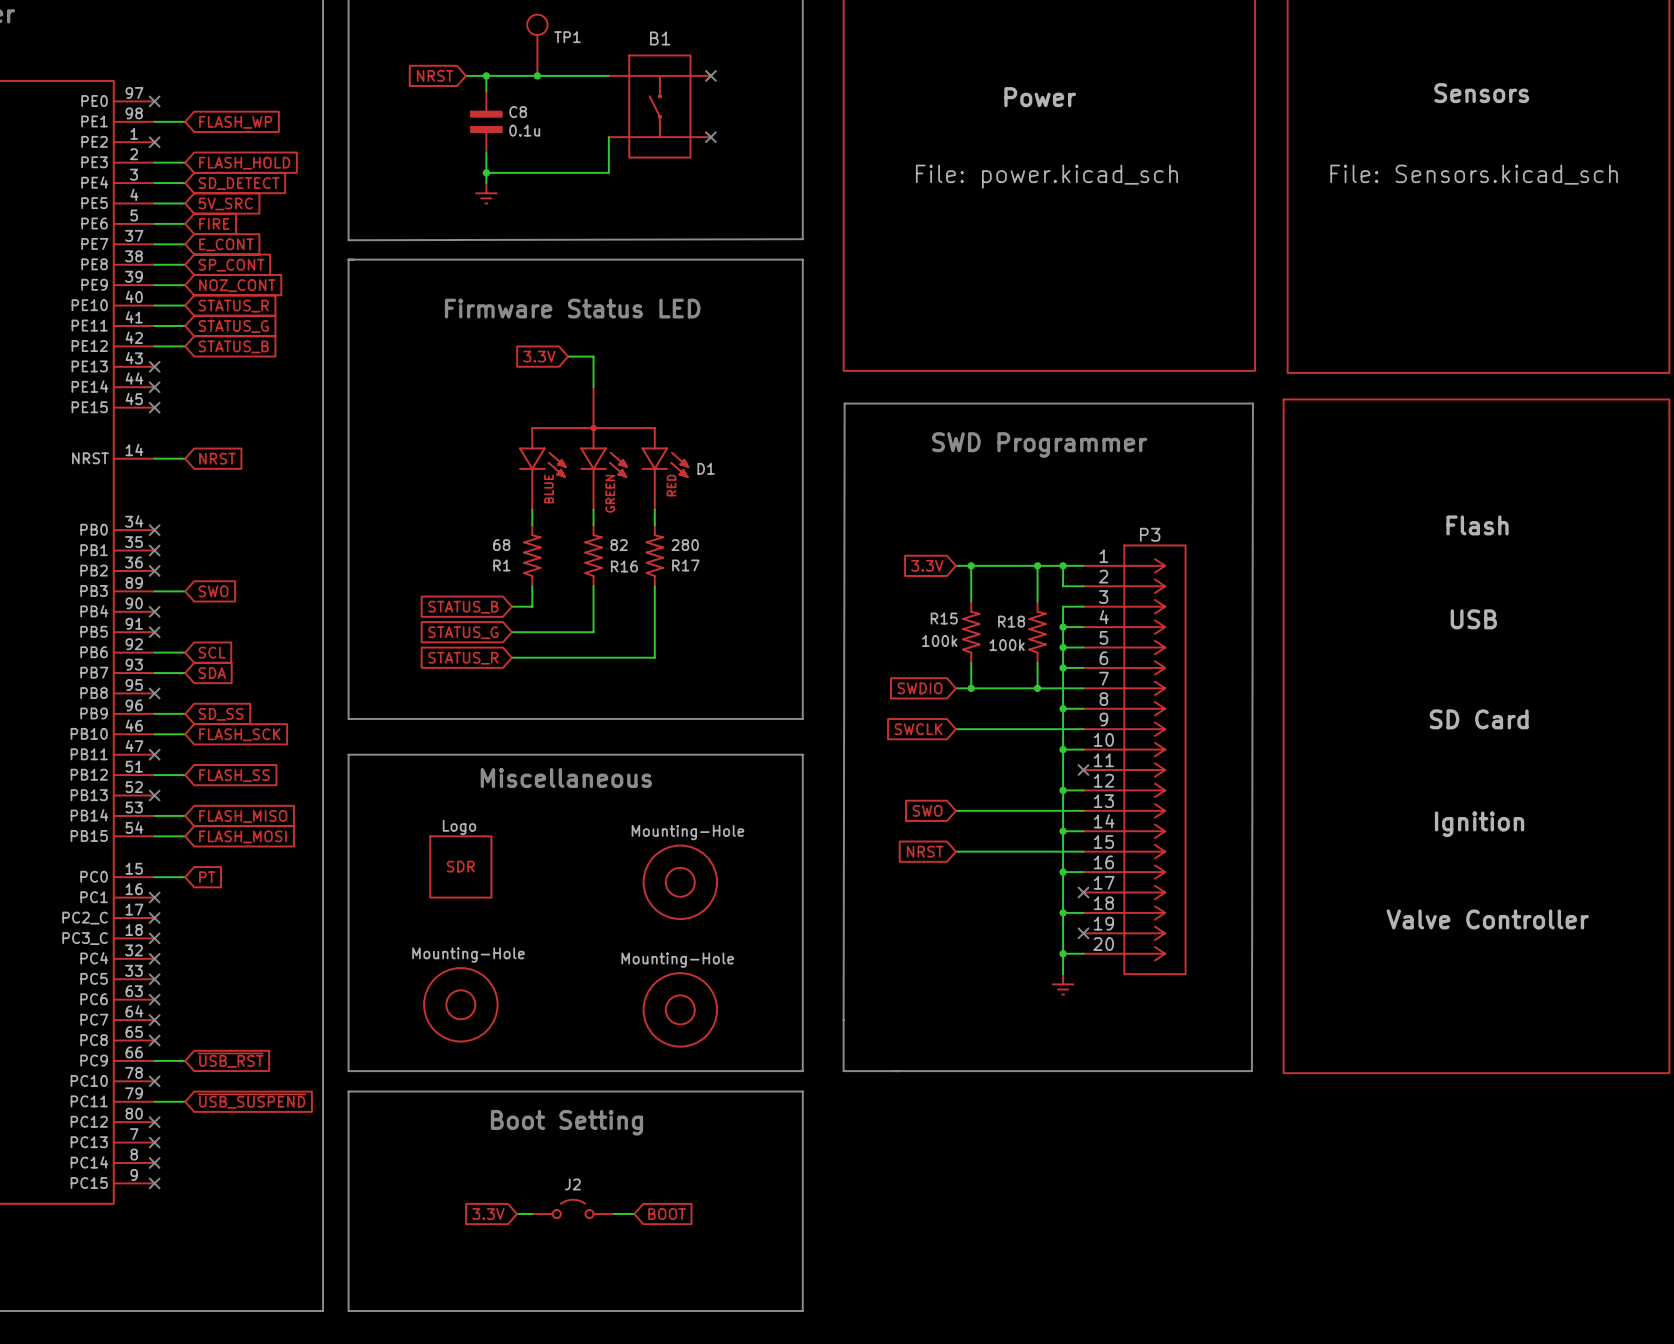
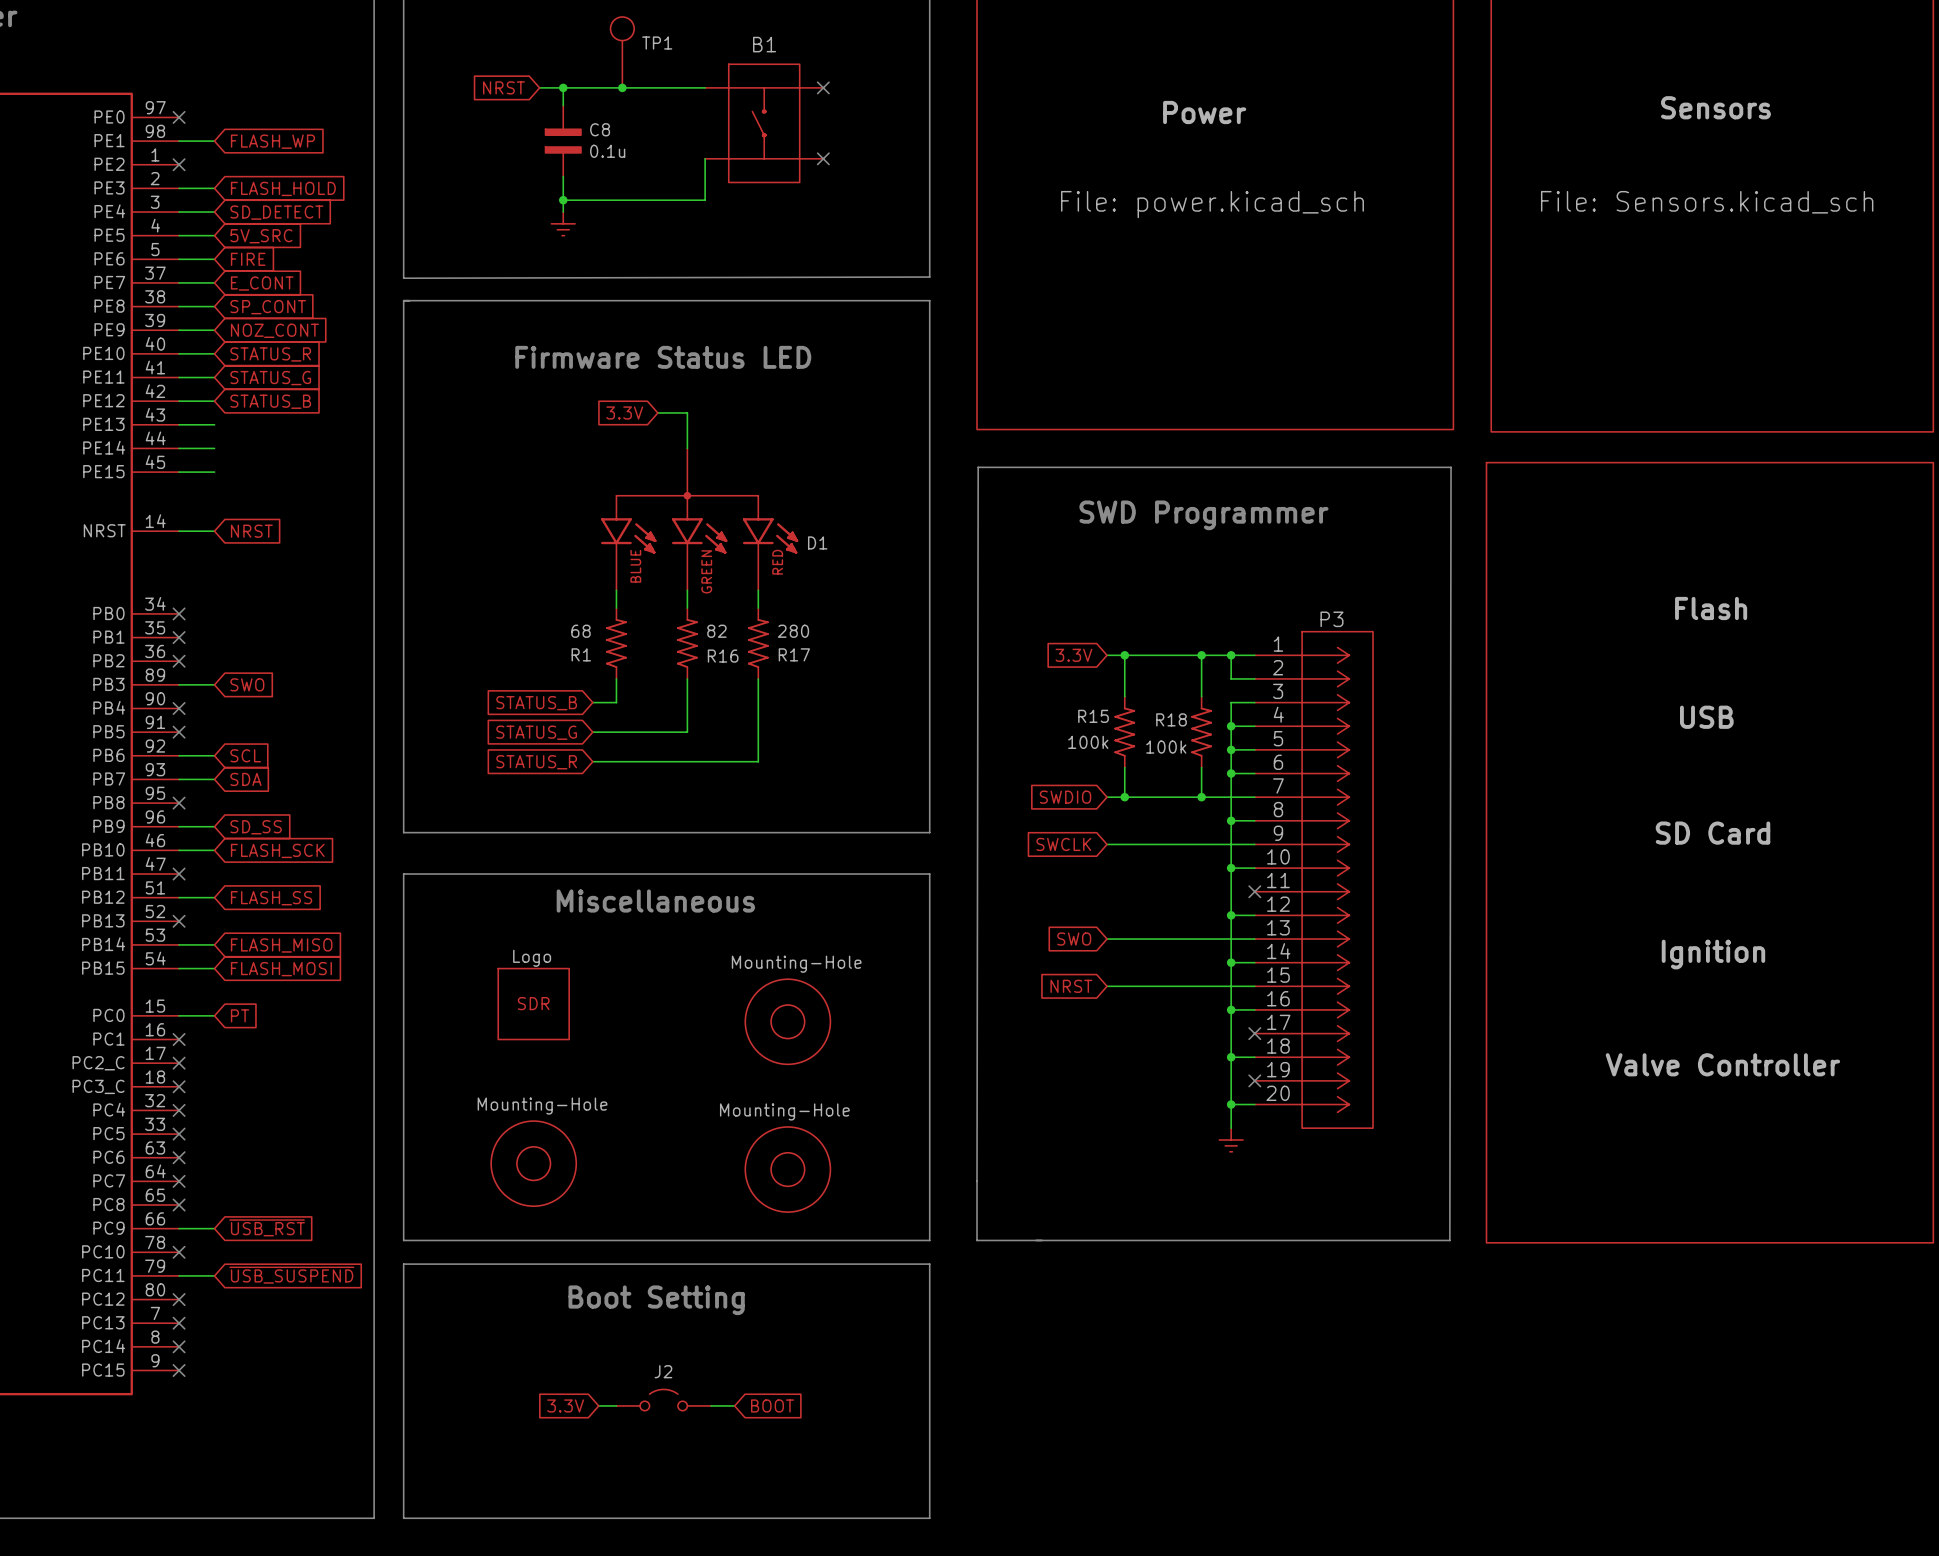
wire: none -> (179, 424) (214, 424)
no-connect mark: (154, 366) -> none
wire: none -> (179, 448) (214, 448)
no-connect mark: (154, 387) -> none
wire: none -> (179, 472) (214, 472)
no-connect mark: (154, 407) -> none

